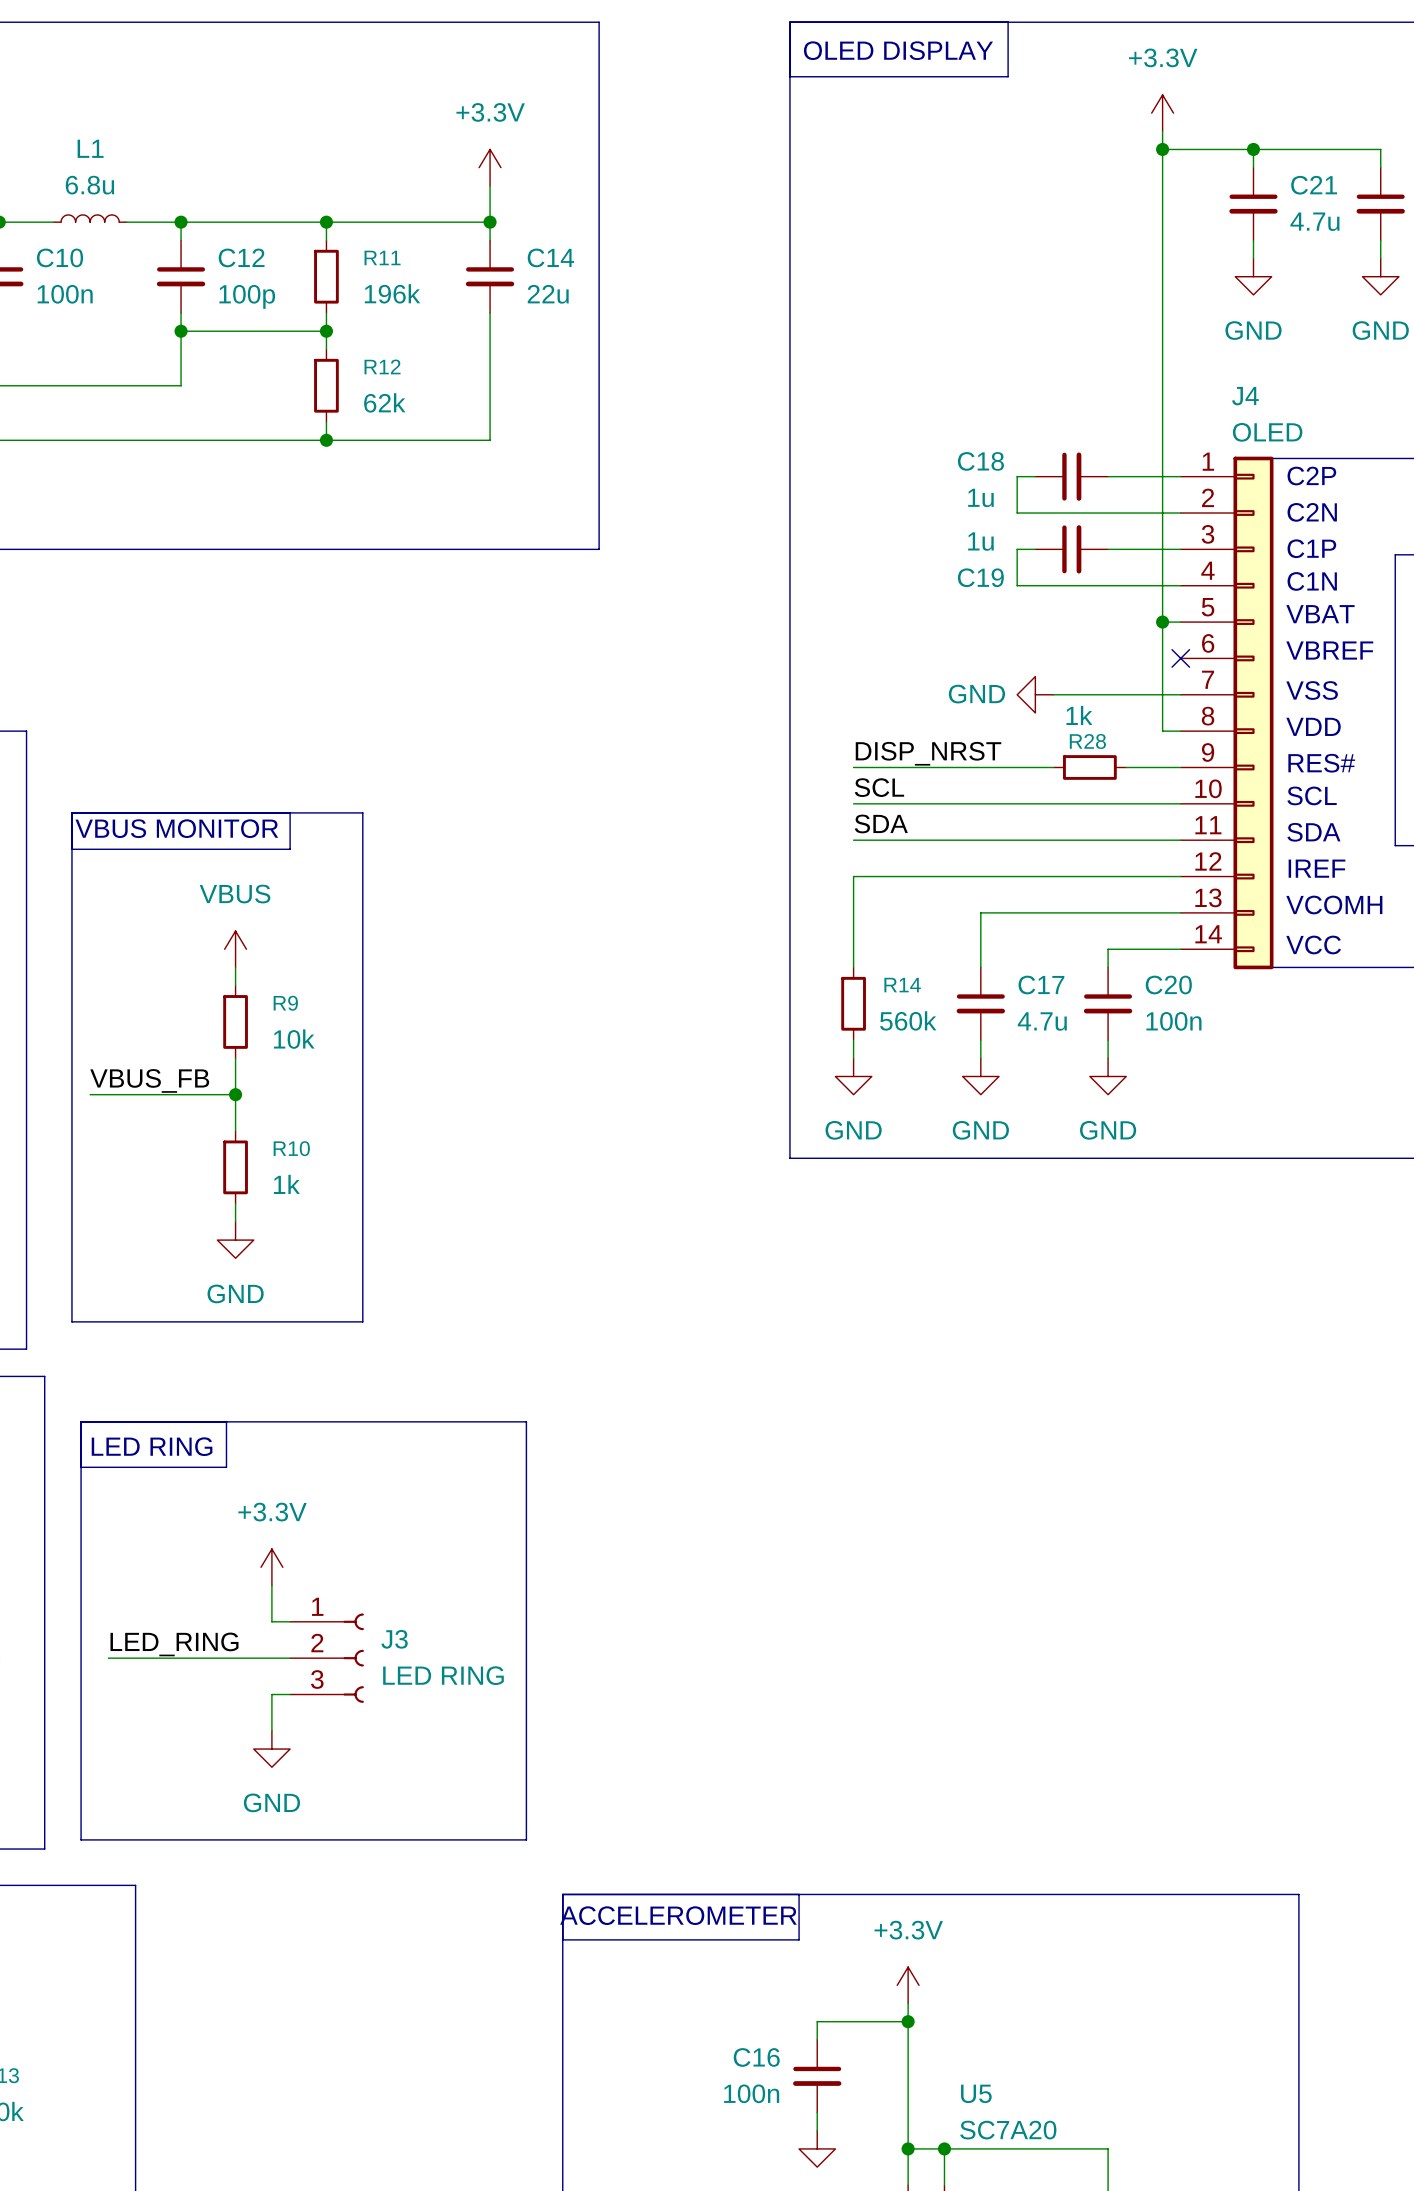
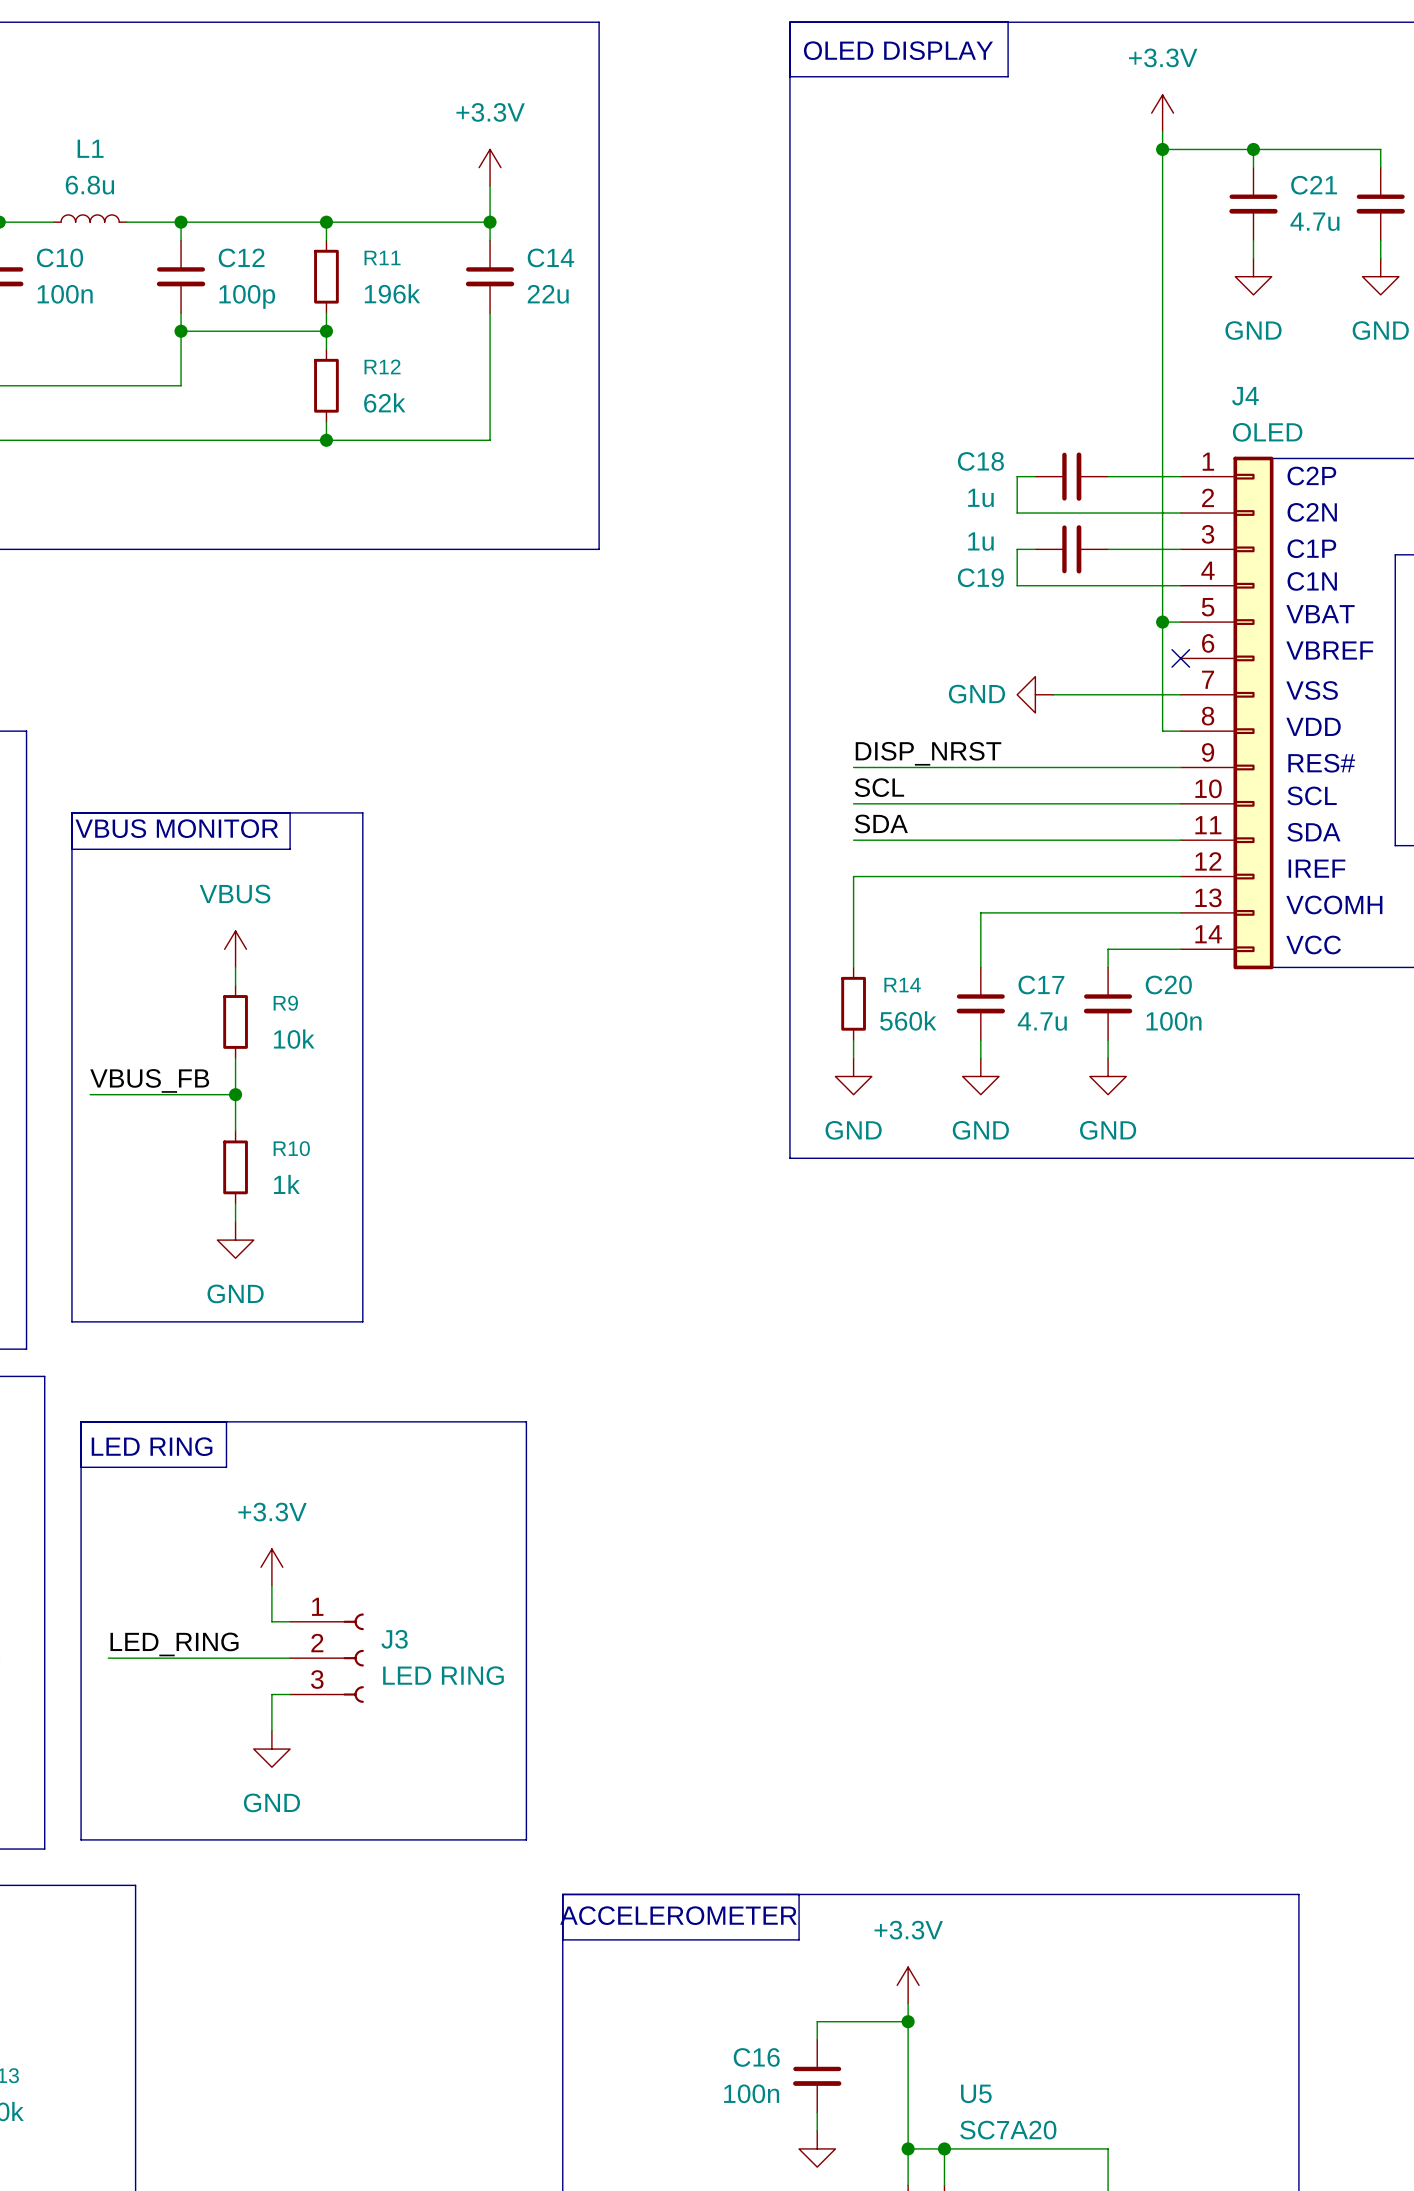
wire: none -> (1053, 767) (1126, 767)
R28: 1k (1089, 767) -> none

